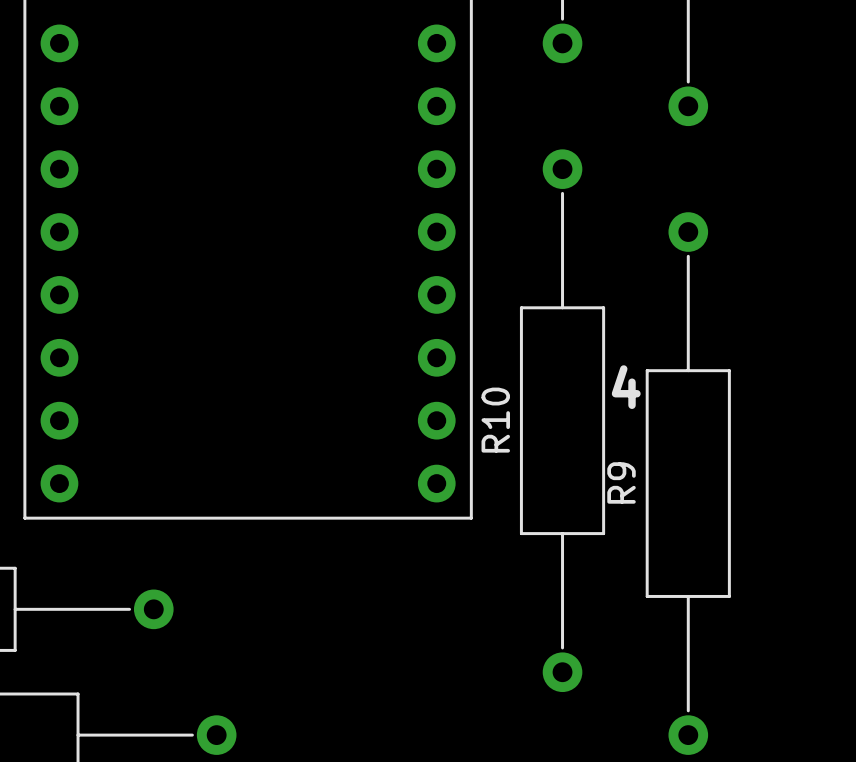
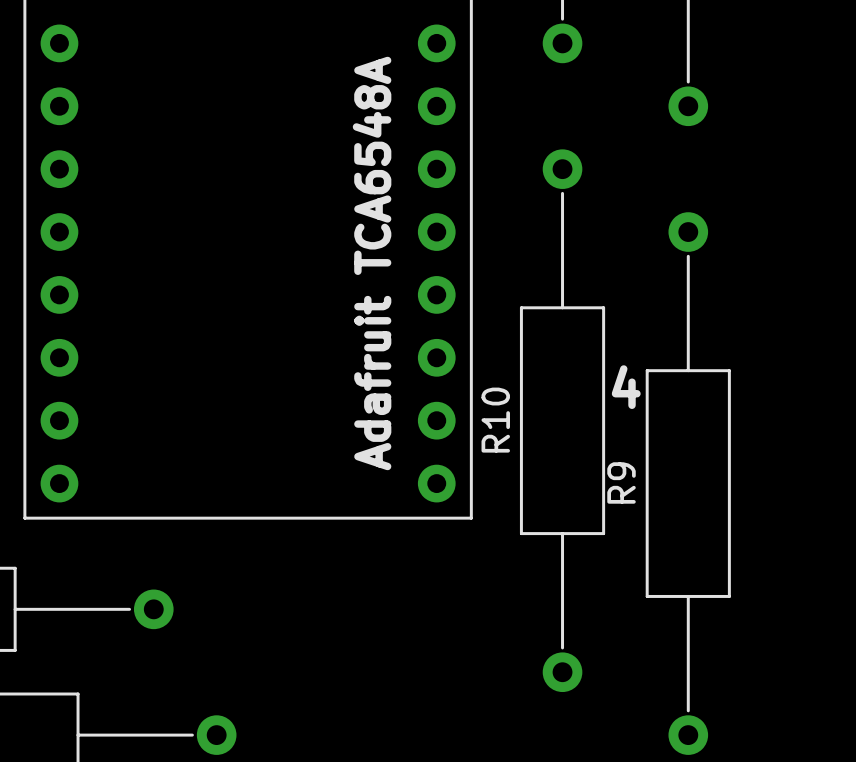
text: none -> Adafruit TCA6548A (372, 263)

